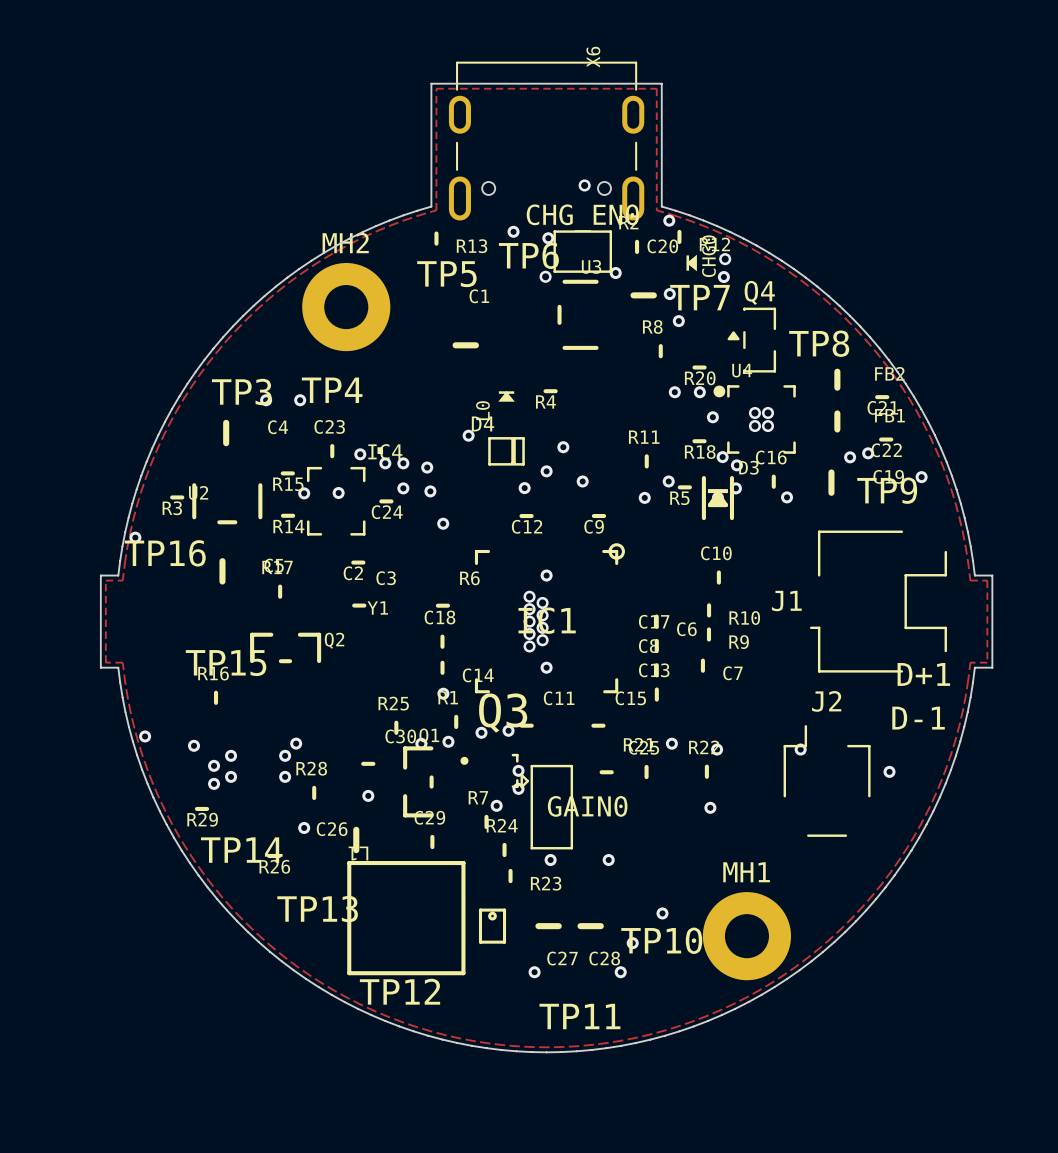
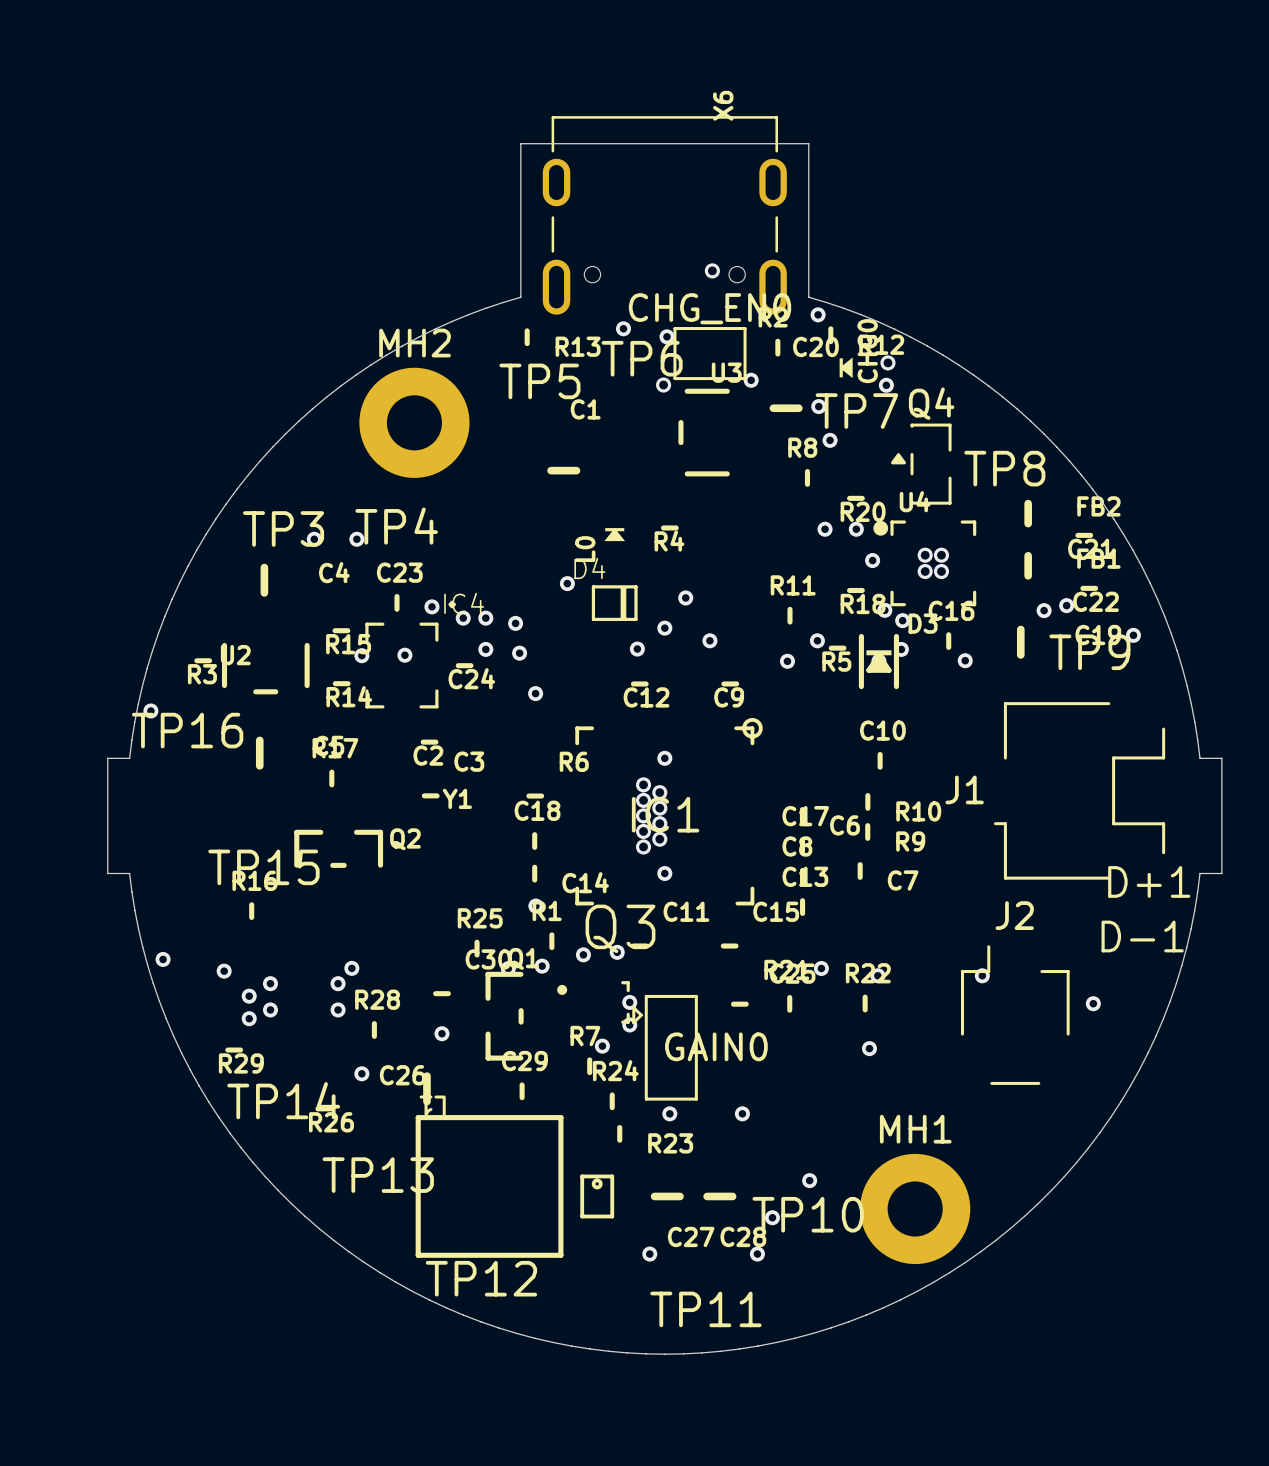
zone outline: (436, 88) (436, 210) (405, 220) (364, 236) (326, 257) (290, 281) (257, 309) (226, 340) (199, 374) (176, 411) (156, 450) (141, 491) (130, 533) (122, 580) (105, 580) (105, 662) (122, 662) (130, 711) (142, 754) (158, 795) (185, 847) (211, 884) (230, 906) (262, 938) (296, 966) (334, 990) (373, 1010) (415, 1026) (458, 1038) (502, 1044) (546, 1047) (591, 1044) (634, 1038) (663, 1030) (705, 1016) (732, 1004) (771, 982) (796, 966) (831, 938) (852, 917) (881, 884) (914, 835) (940, 781) (959, 725) (970, 662) (987, 662) (987, 580) (970, 580) (959, 518) (936, 450) (909, 399) (866, 340) (814, 290) (766, 257) (715, 230) (656, 210) (656, 88) (436, 88) -> none

